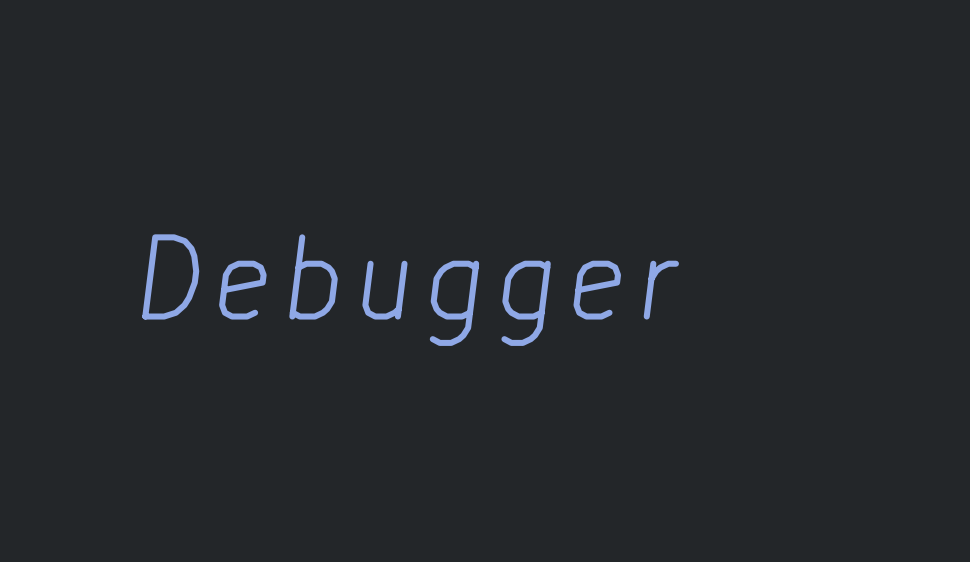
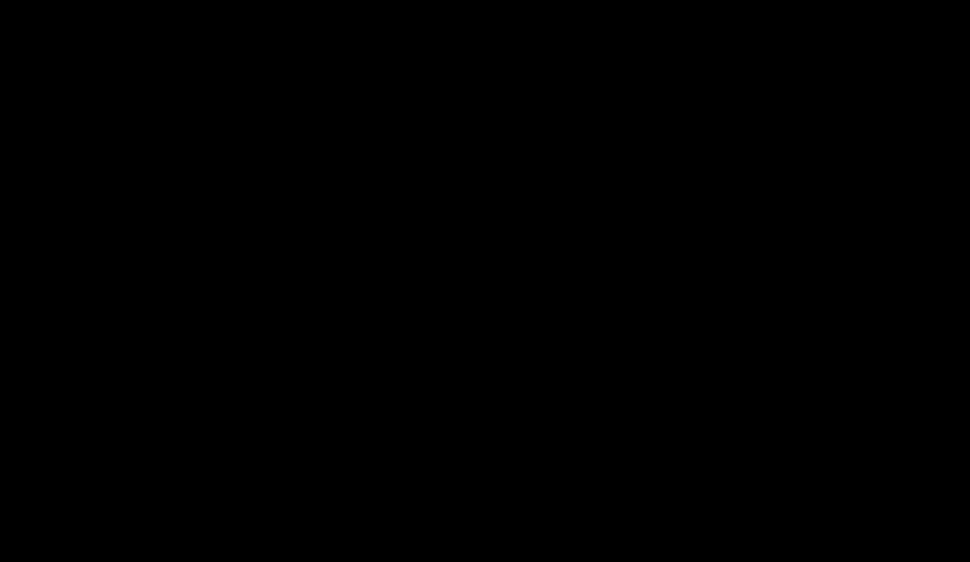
text: Debugger (410, 290) -> none

